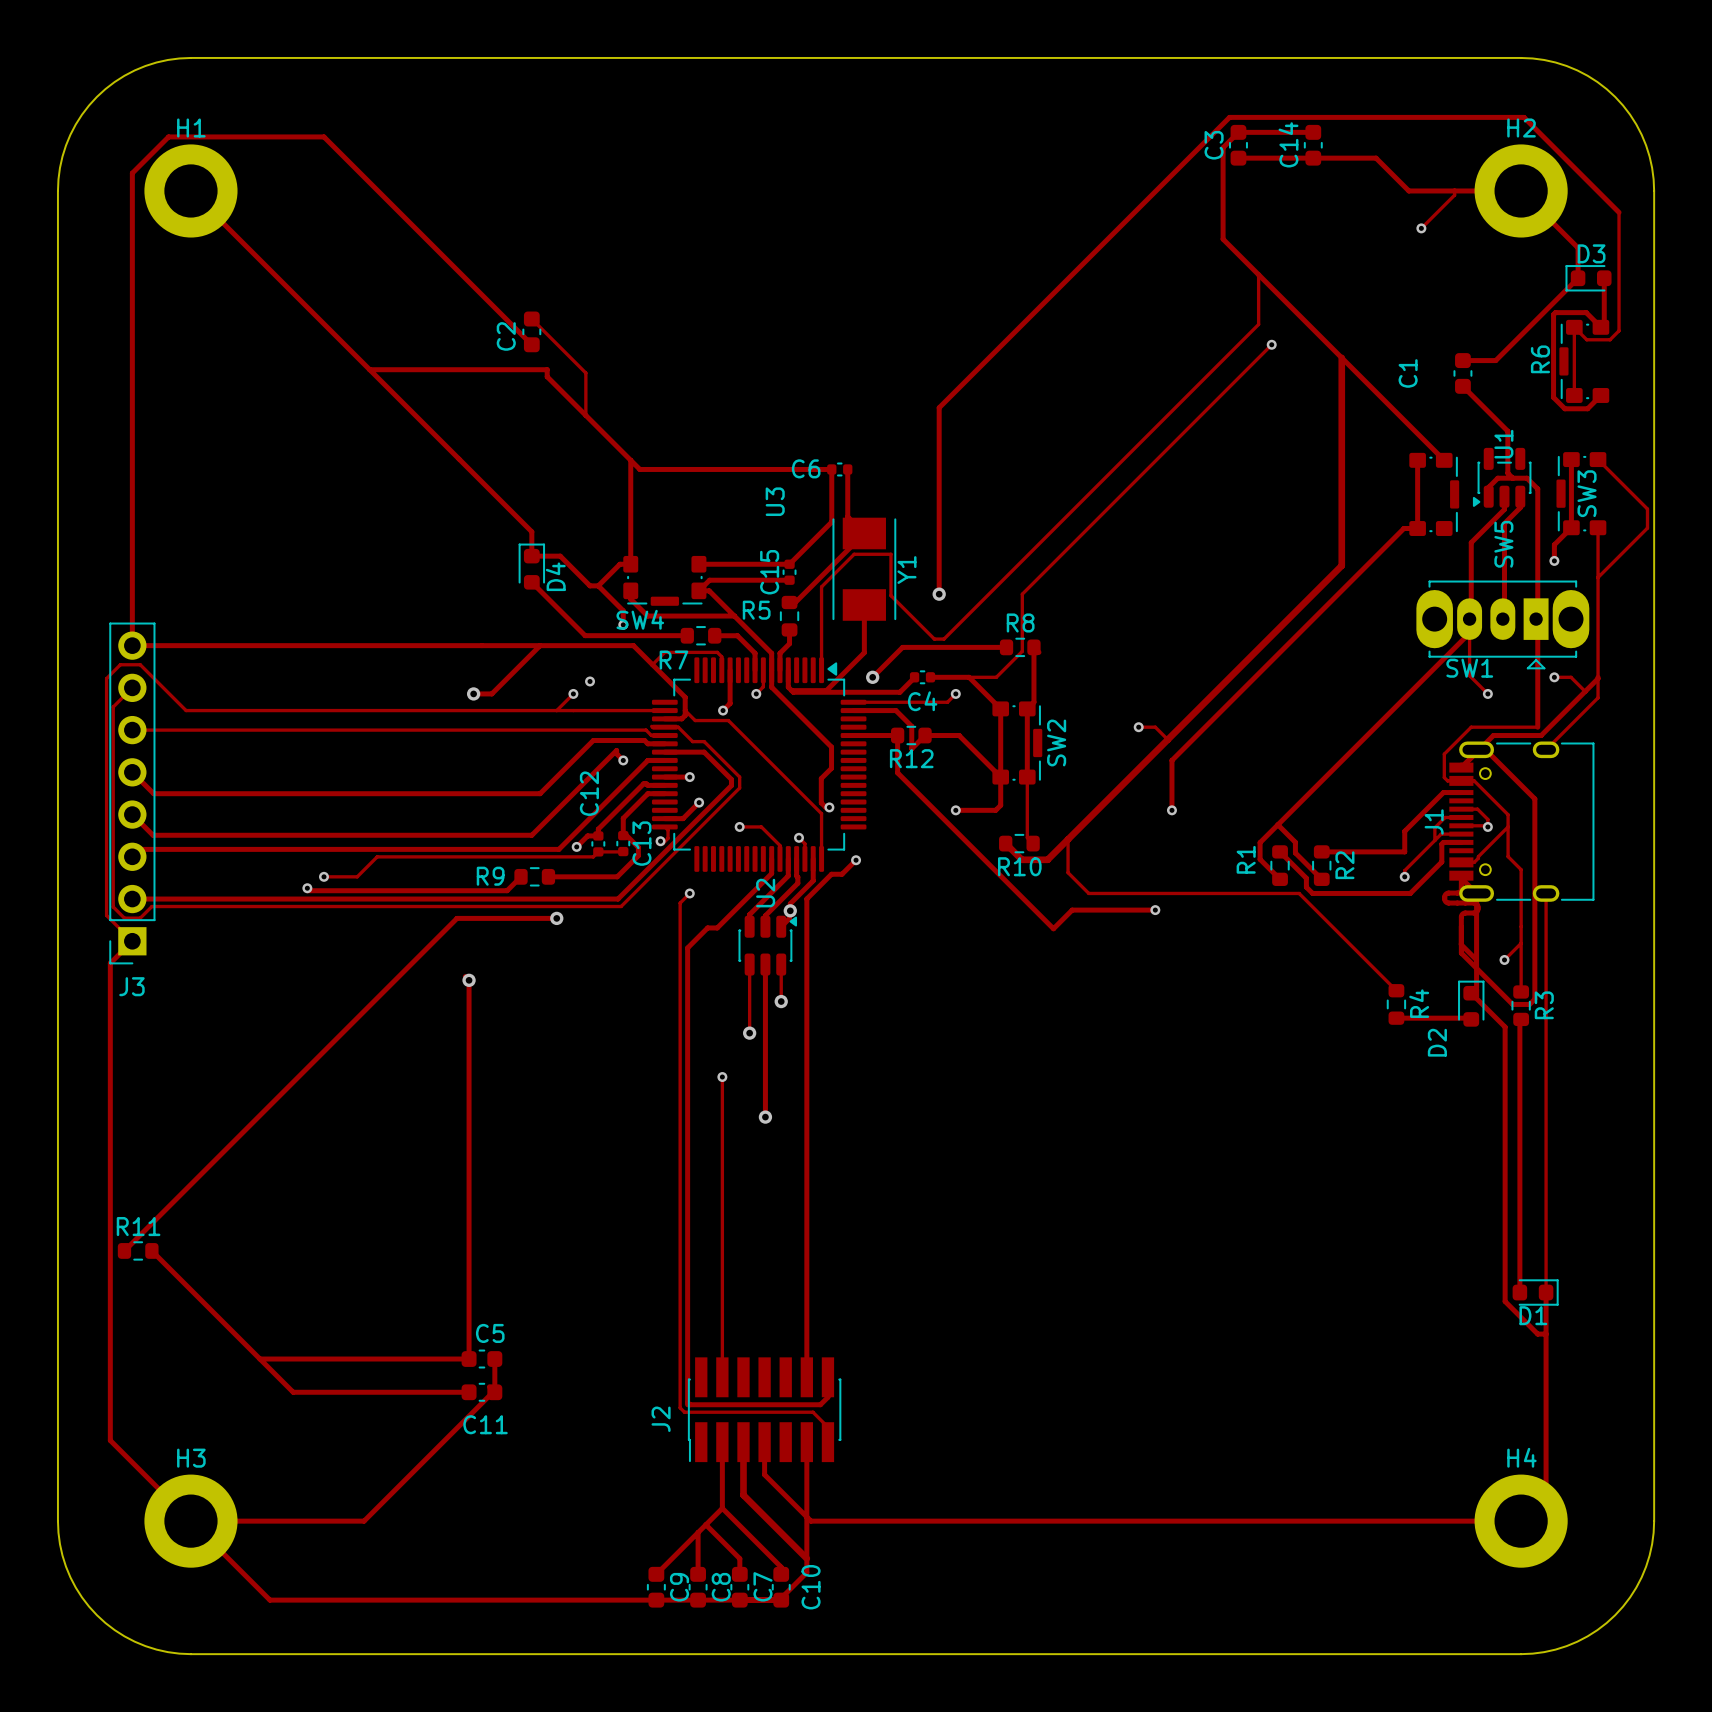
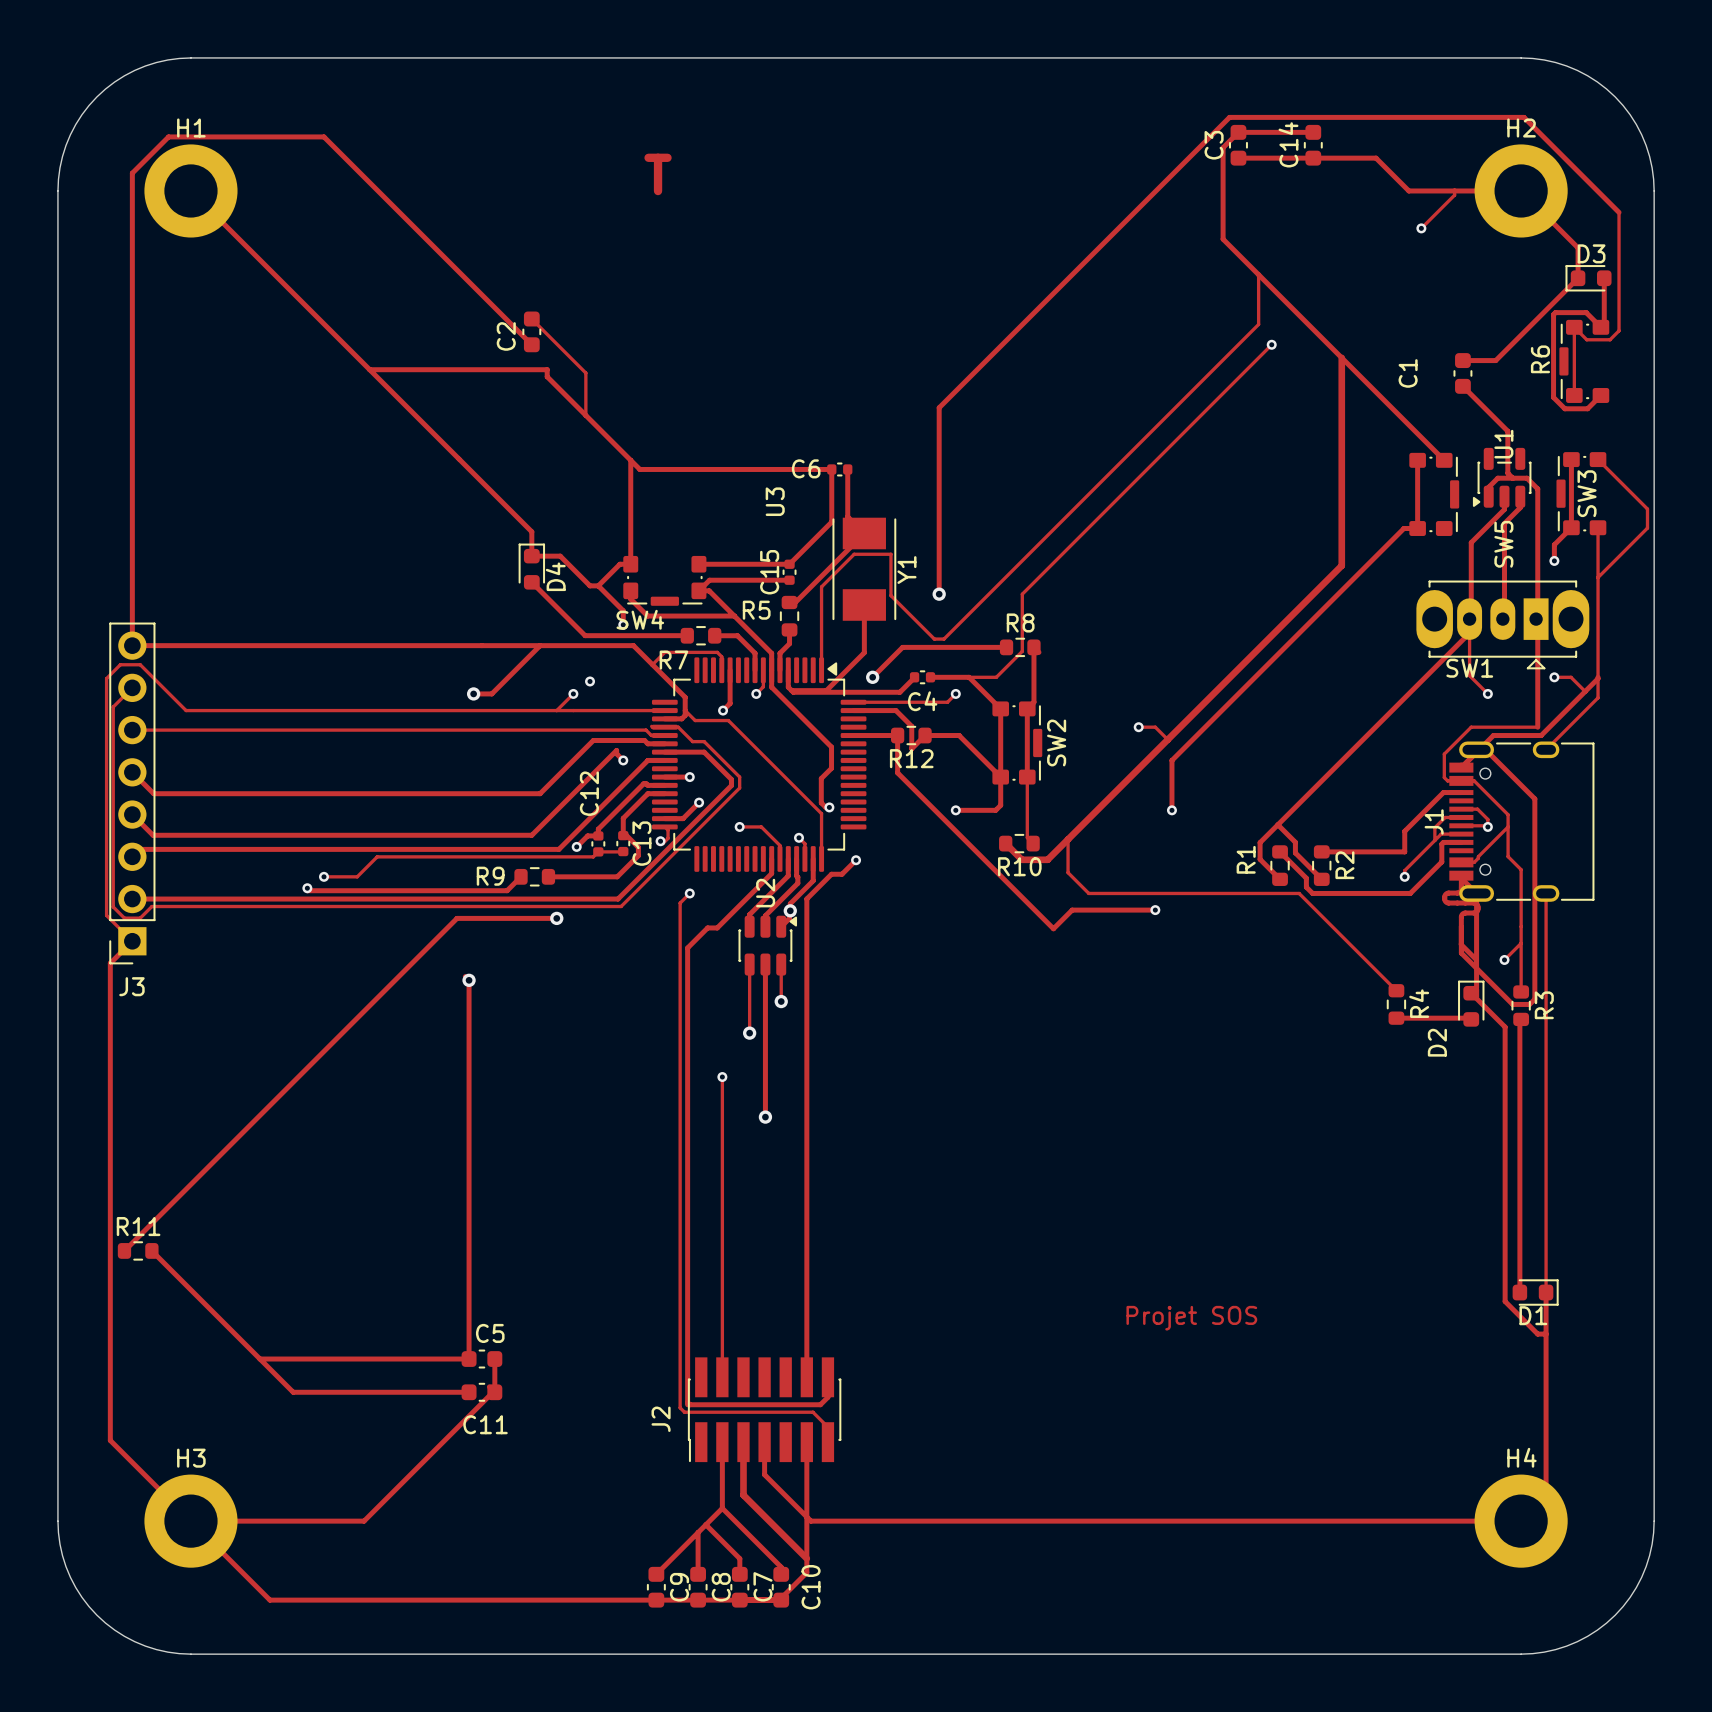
text: none -> T (658, 174)
text: none -> Projet SOS (1191, 1318)

